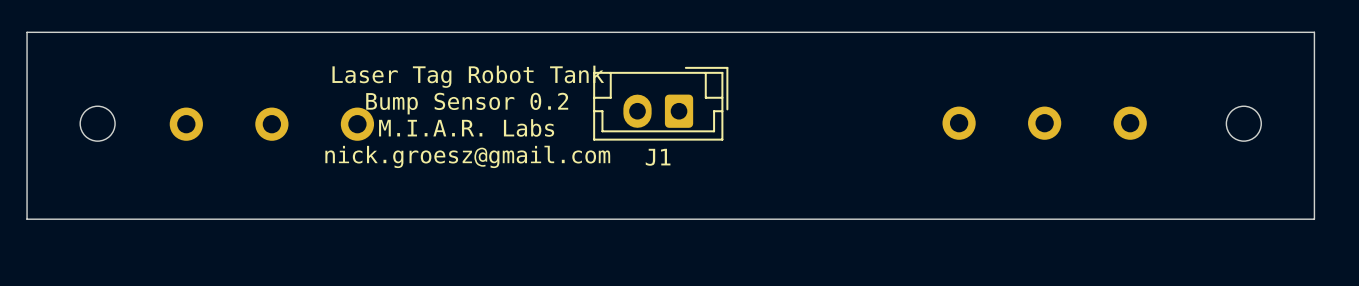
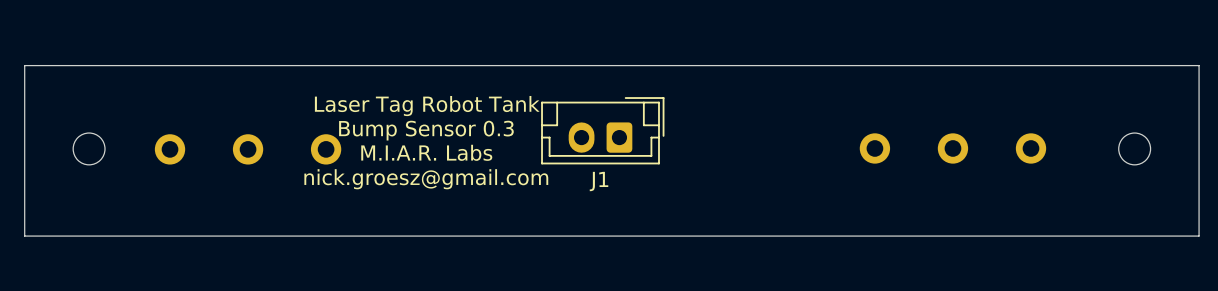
text: Bump Sensor 0.2 (467, 103) -> Bump Sensor 0.3 (426, 130)

